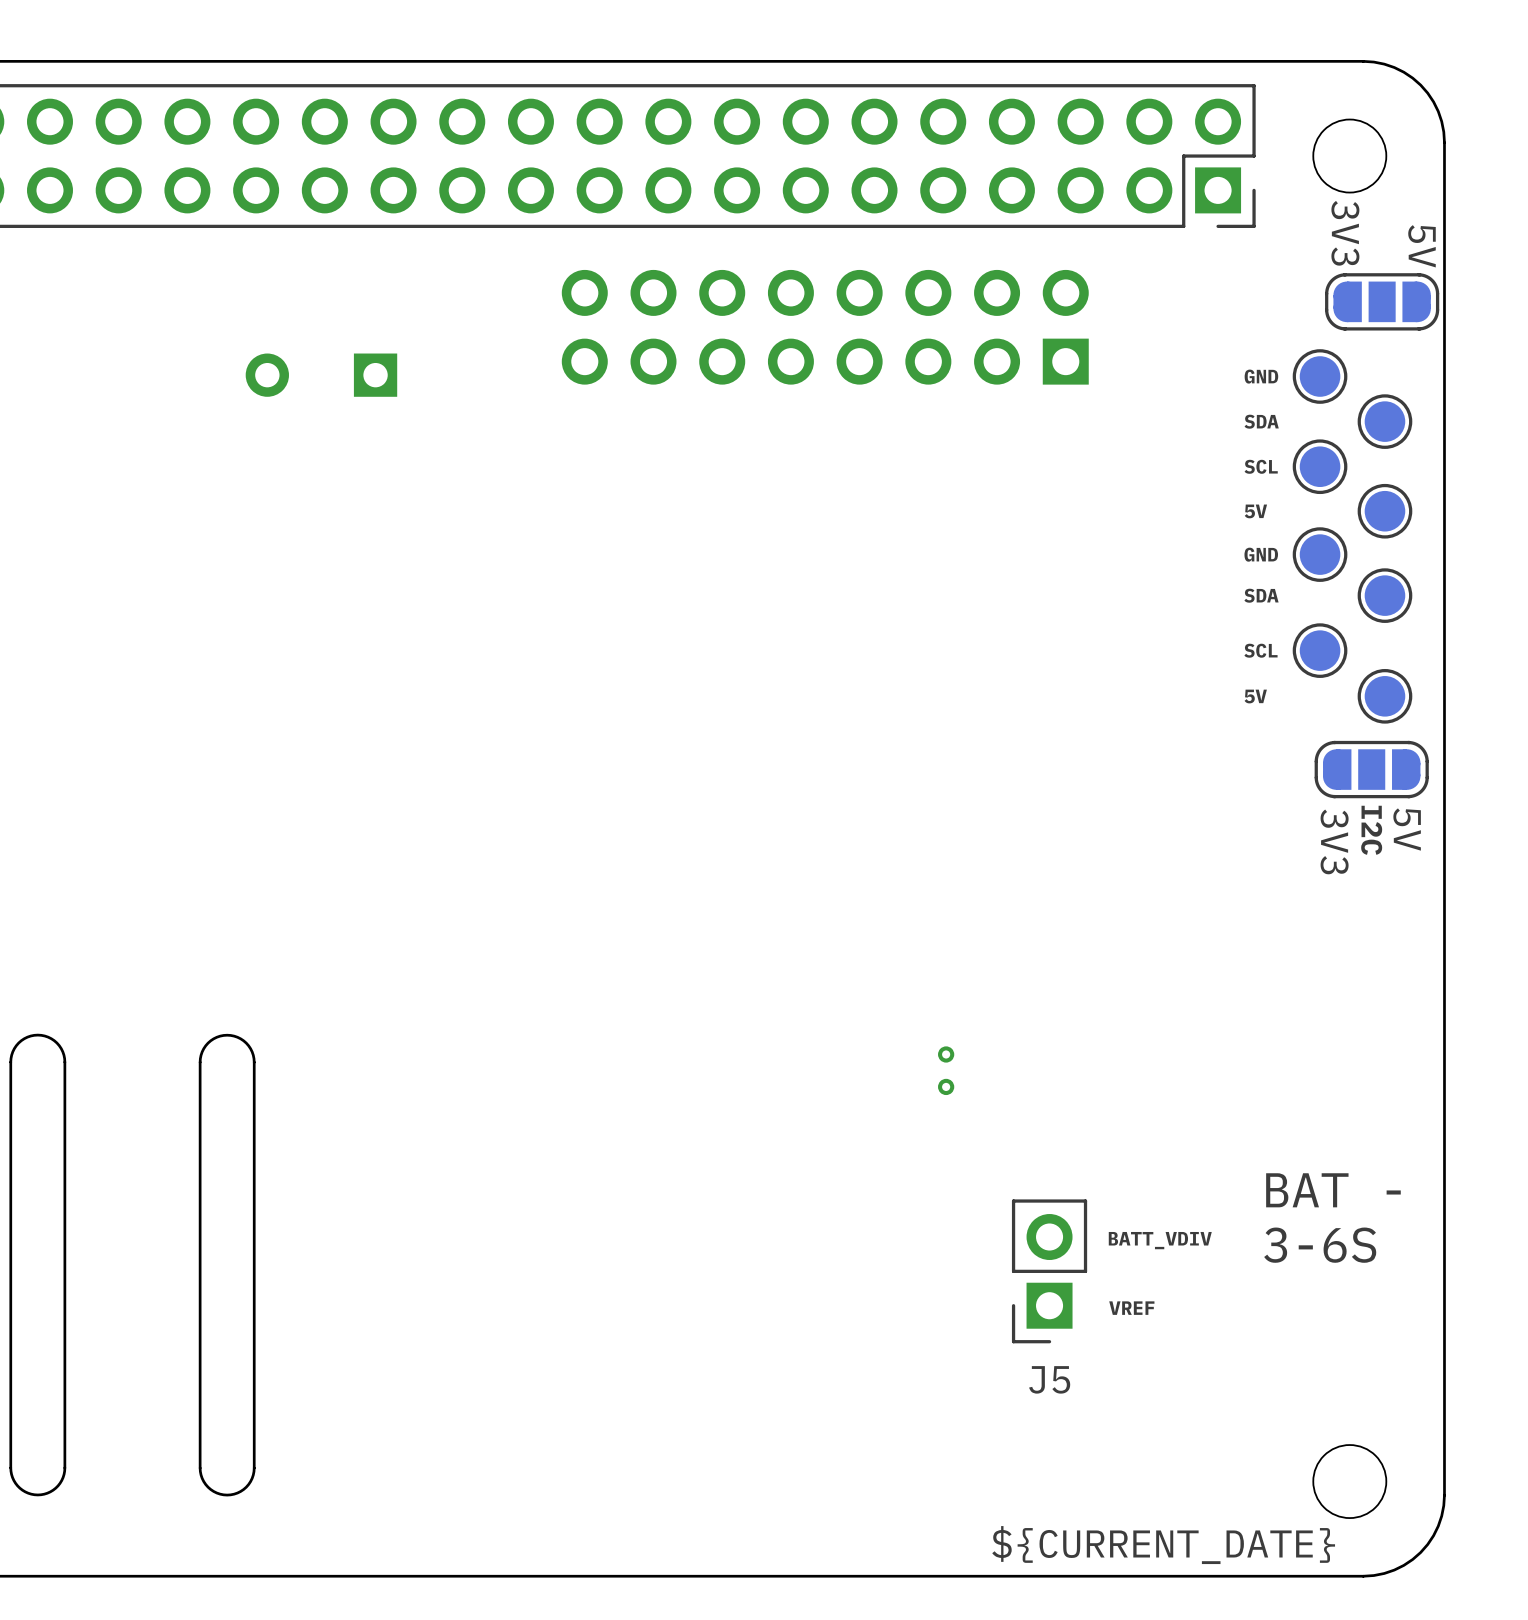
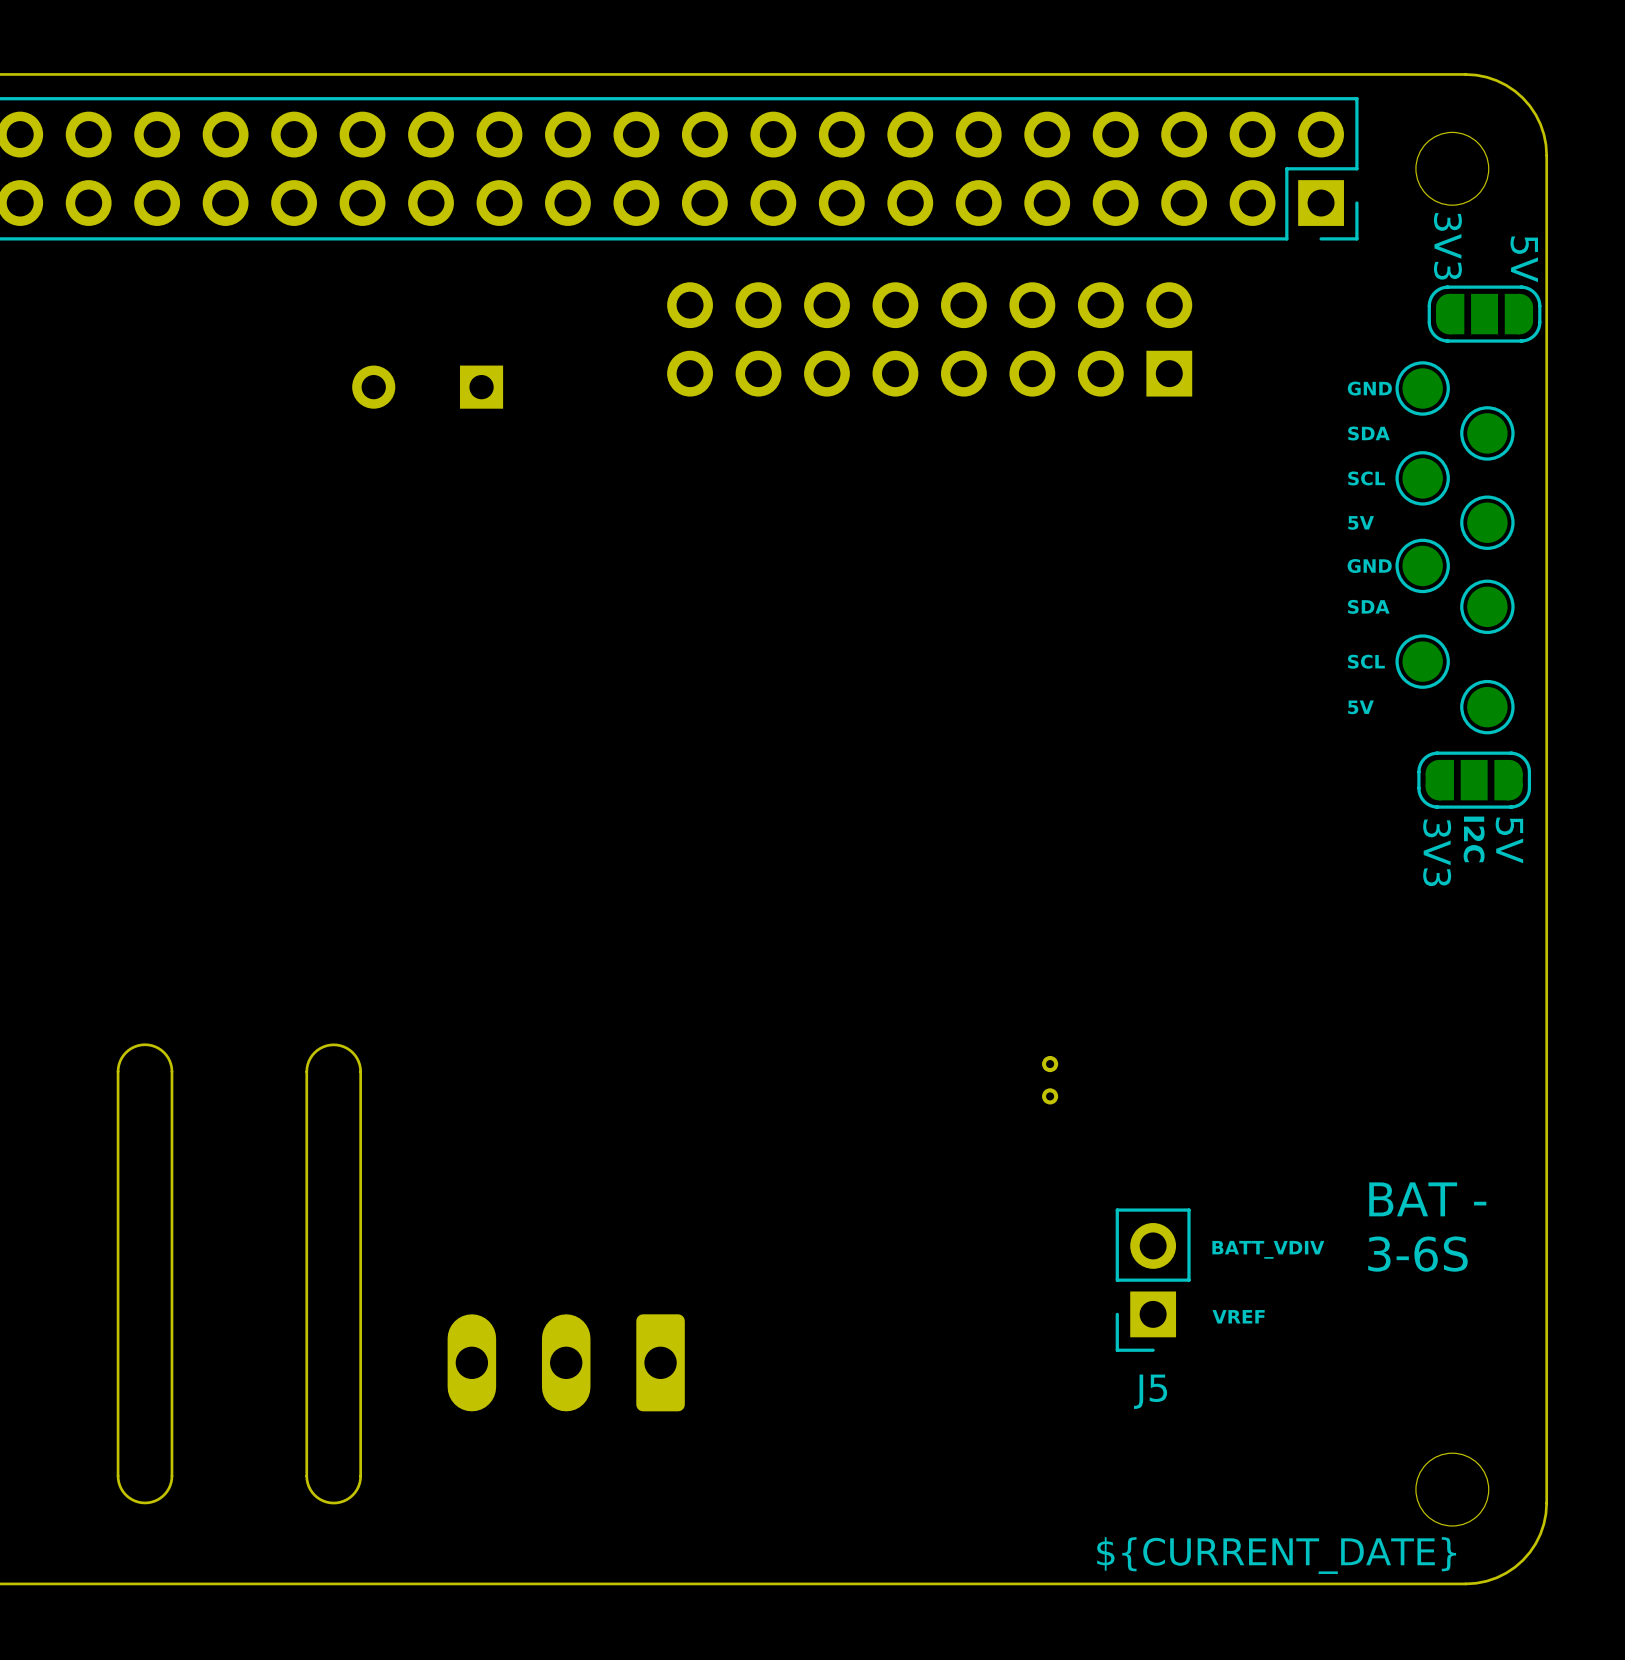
part: none -> (566, 1362)

